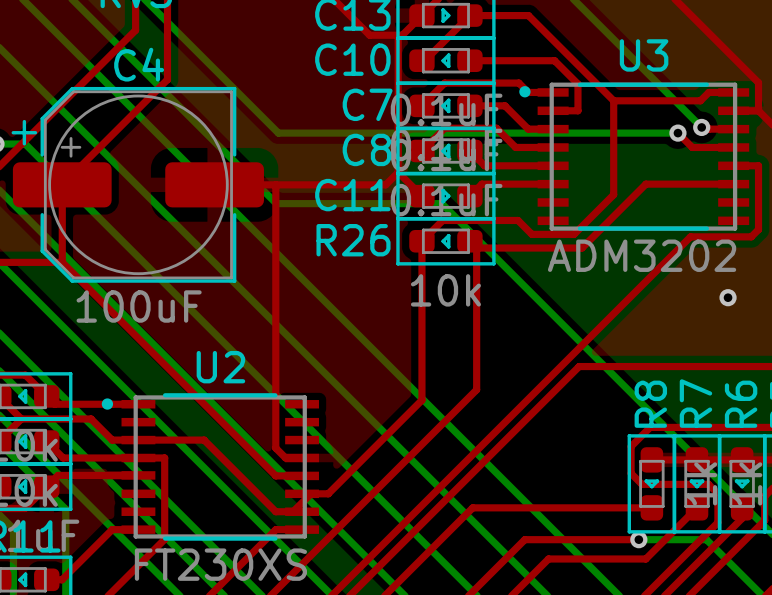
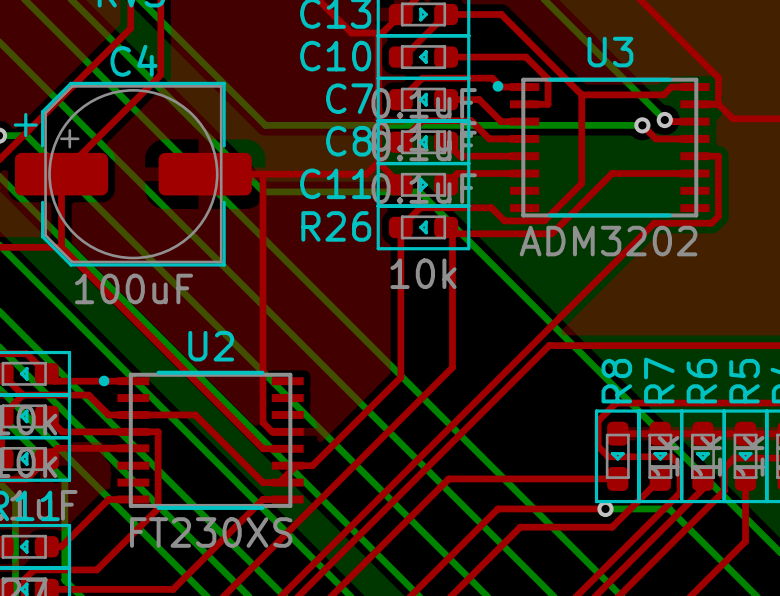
via: (728, 297) -> none

